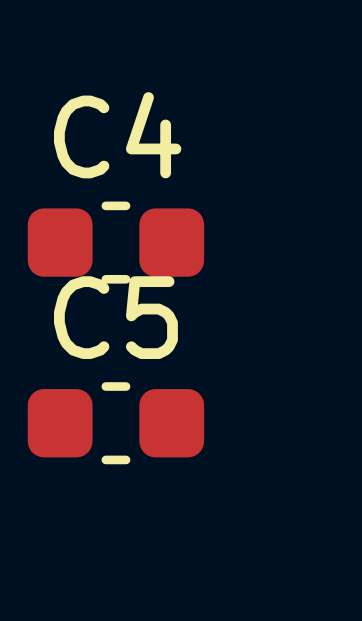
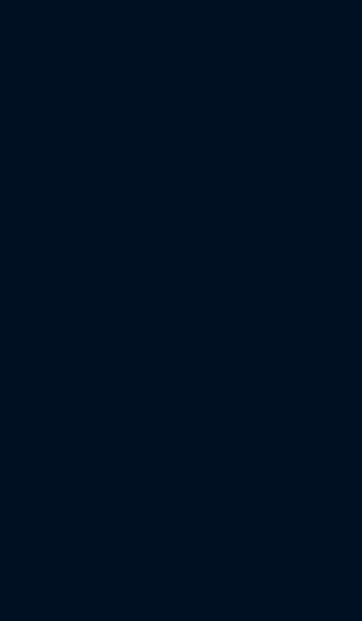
C4: (115, 242) -> none
C5: (115, 423) -> none

